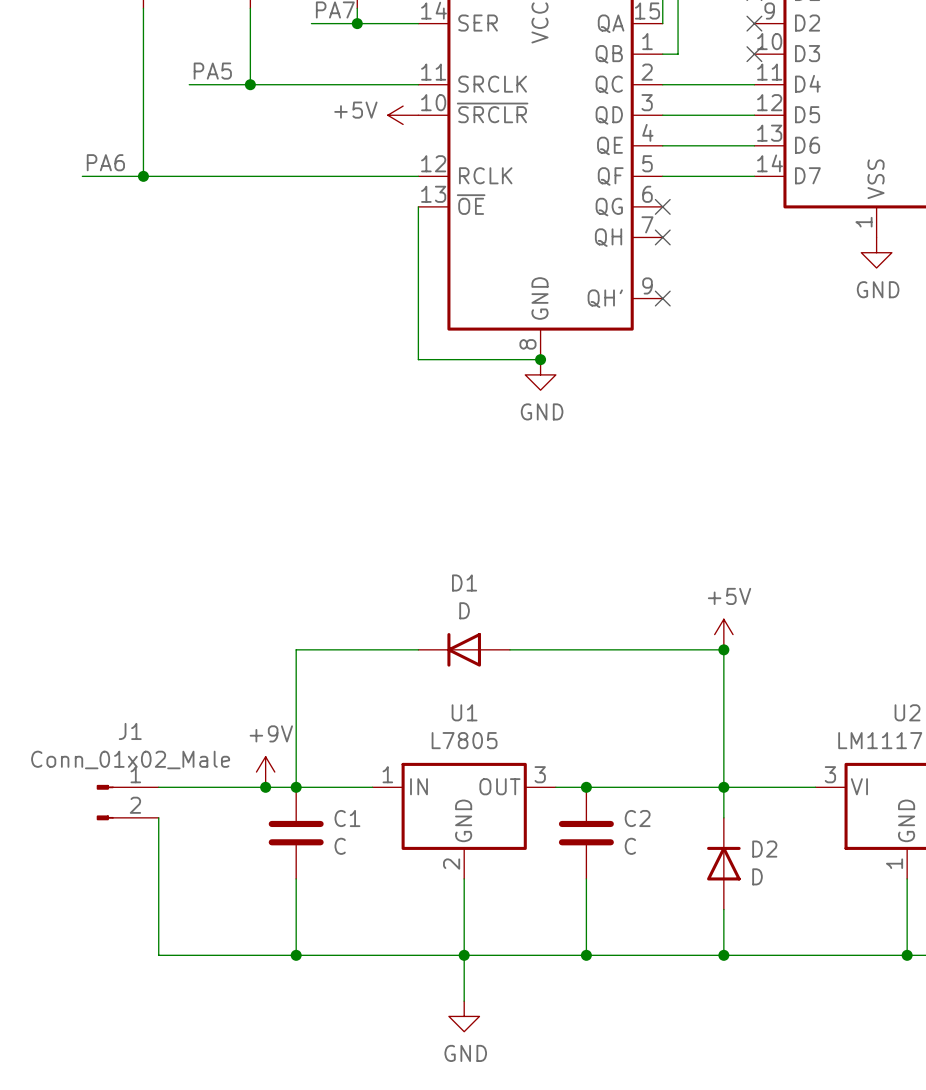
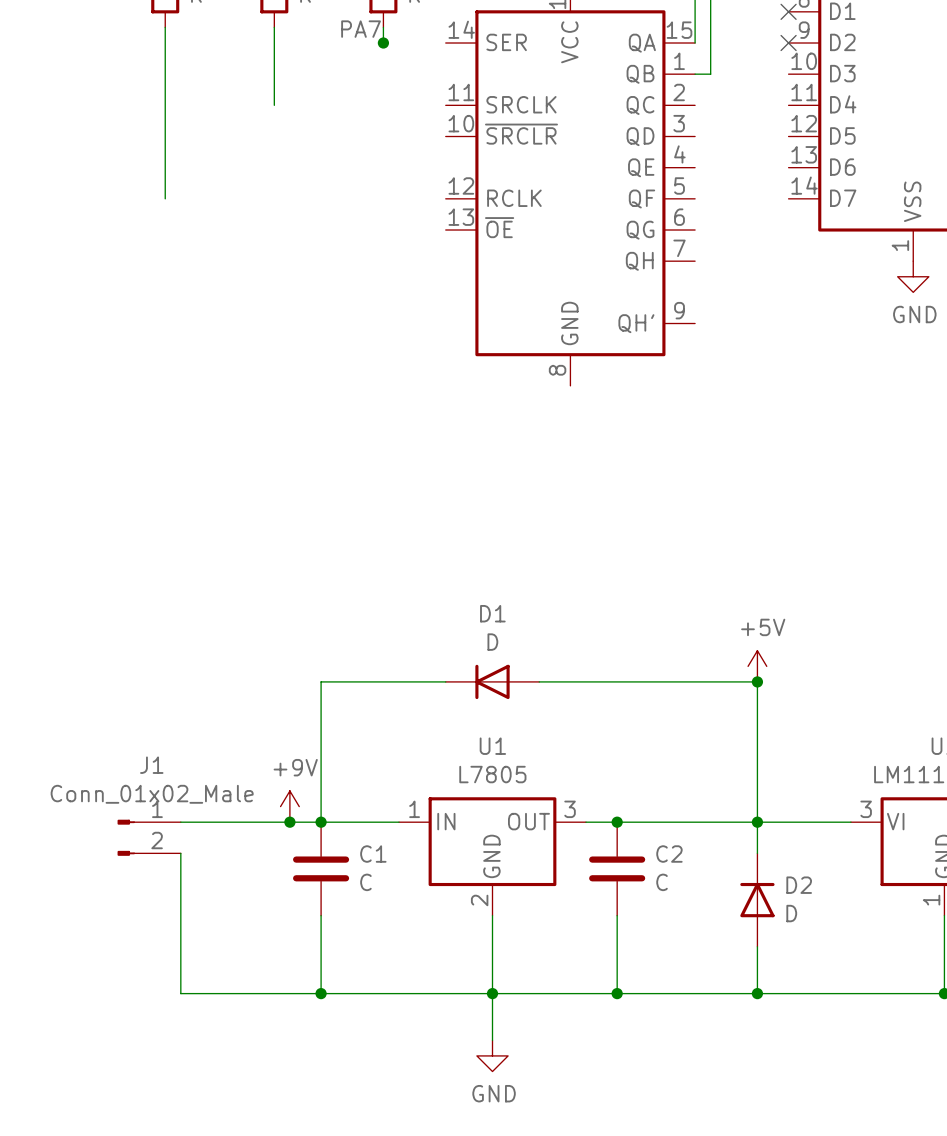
wire: (311, 23) (418, 23) -> none
no-connect mark: (754, 54) -> none
label: PA5 (212, 71) -> none
wire: (189, 84) (418, 84) -> none
junction: (250, 84) -> none
wire: (662, 84) (754, 84) -> none
power symbol: +5V (403, 115) -> none
wire: (662, 115) (754, 115) -> none
wire: (662, 145) (754, 145) -> none
label: PA6 (105, 162) -> none
wire: (82, 176) (418, 176) -> none
junction: (143, 176) -> none
wire: (662, 176) (754, 176) -> none
wire: (418, 206) (418, 359) (540, 359) -> none
no-connect mark: (662, 206) -> none
no-connect mark: (662, 237) -> none
no-connect mark: (662, 298) -> none
junction: (540, 359) -> none
power symbol: GND (540, 374) -> none

